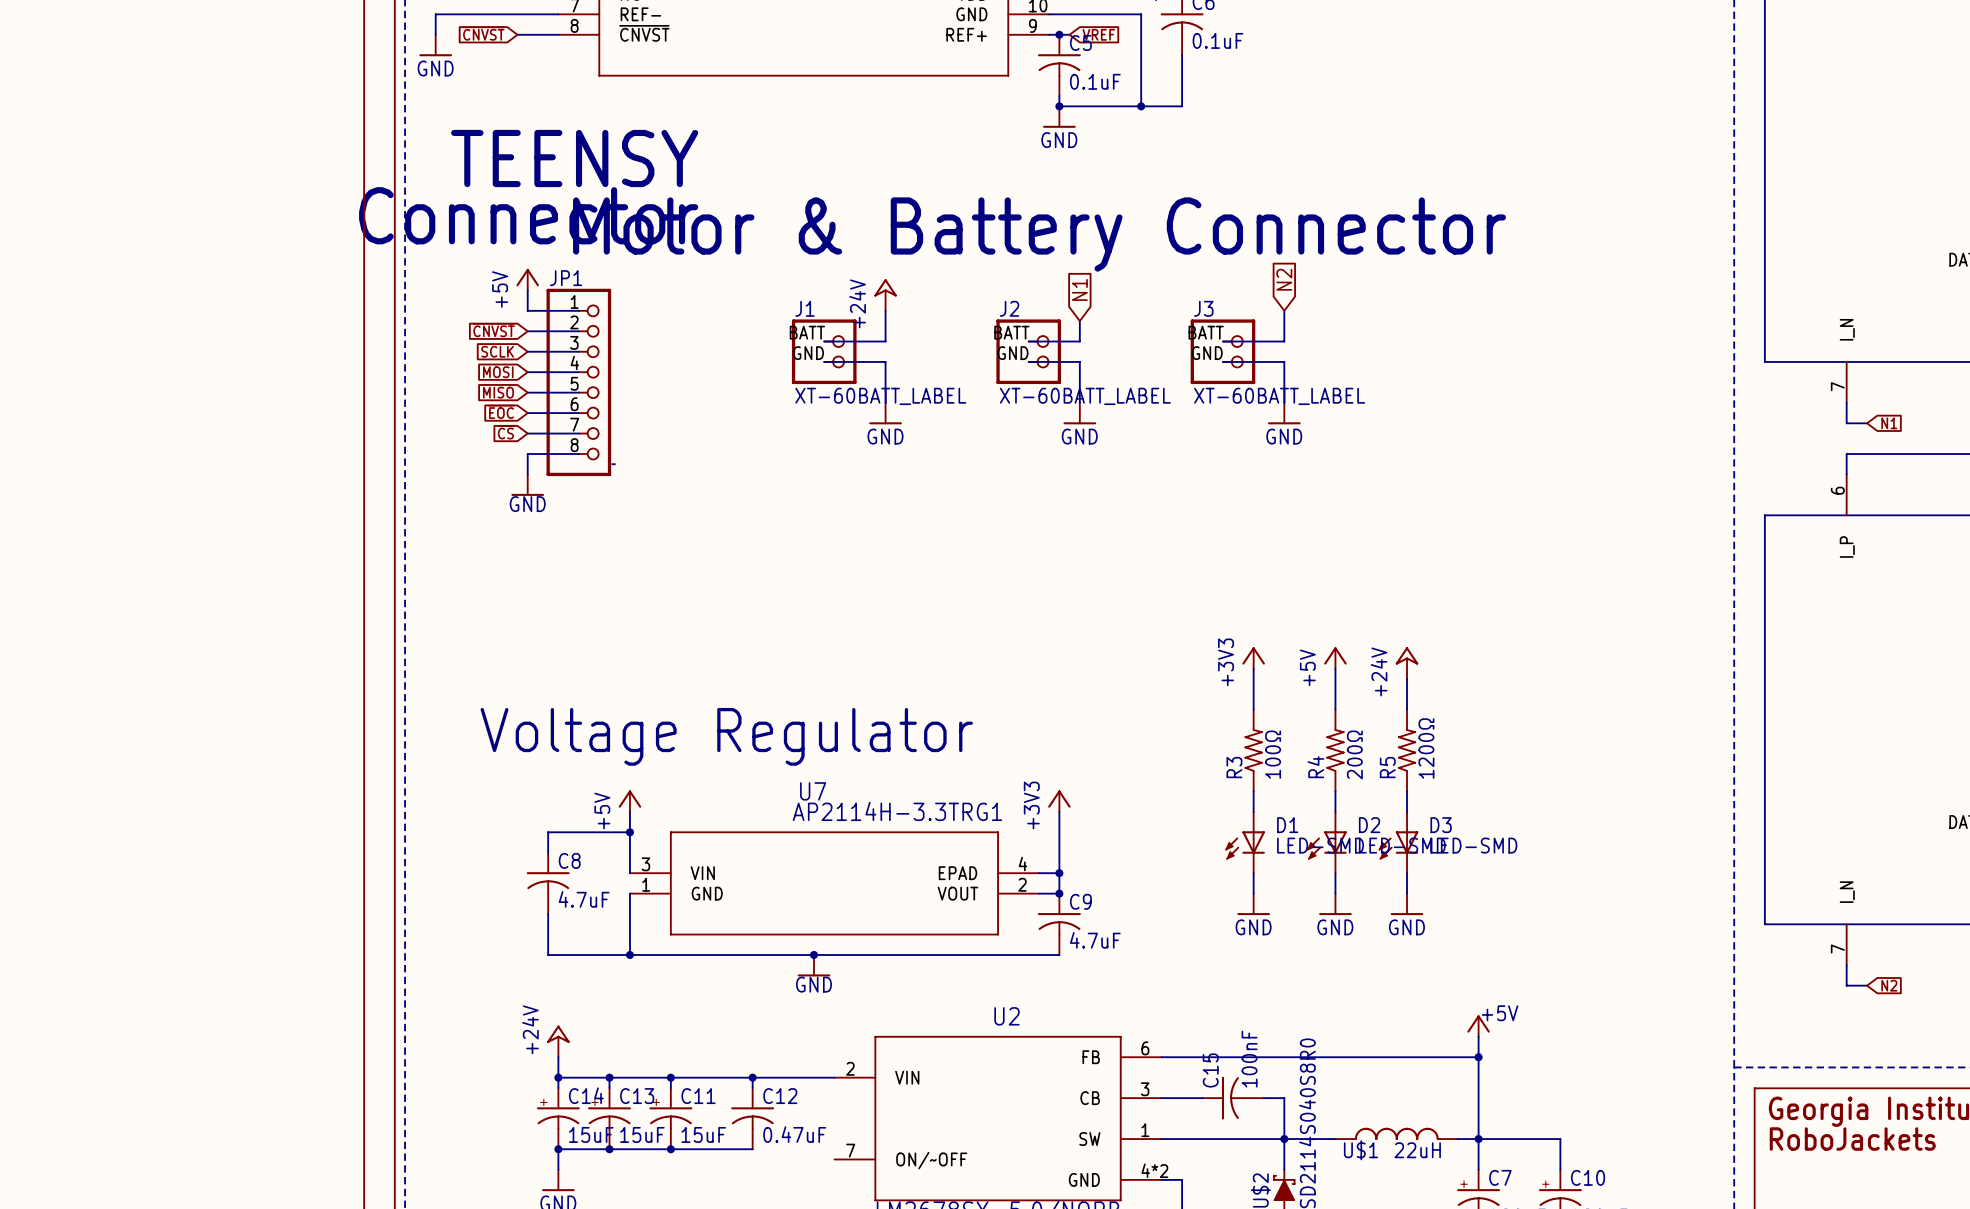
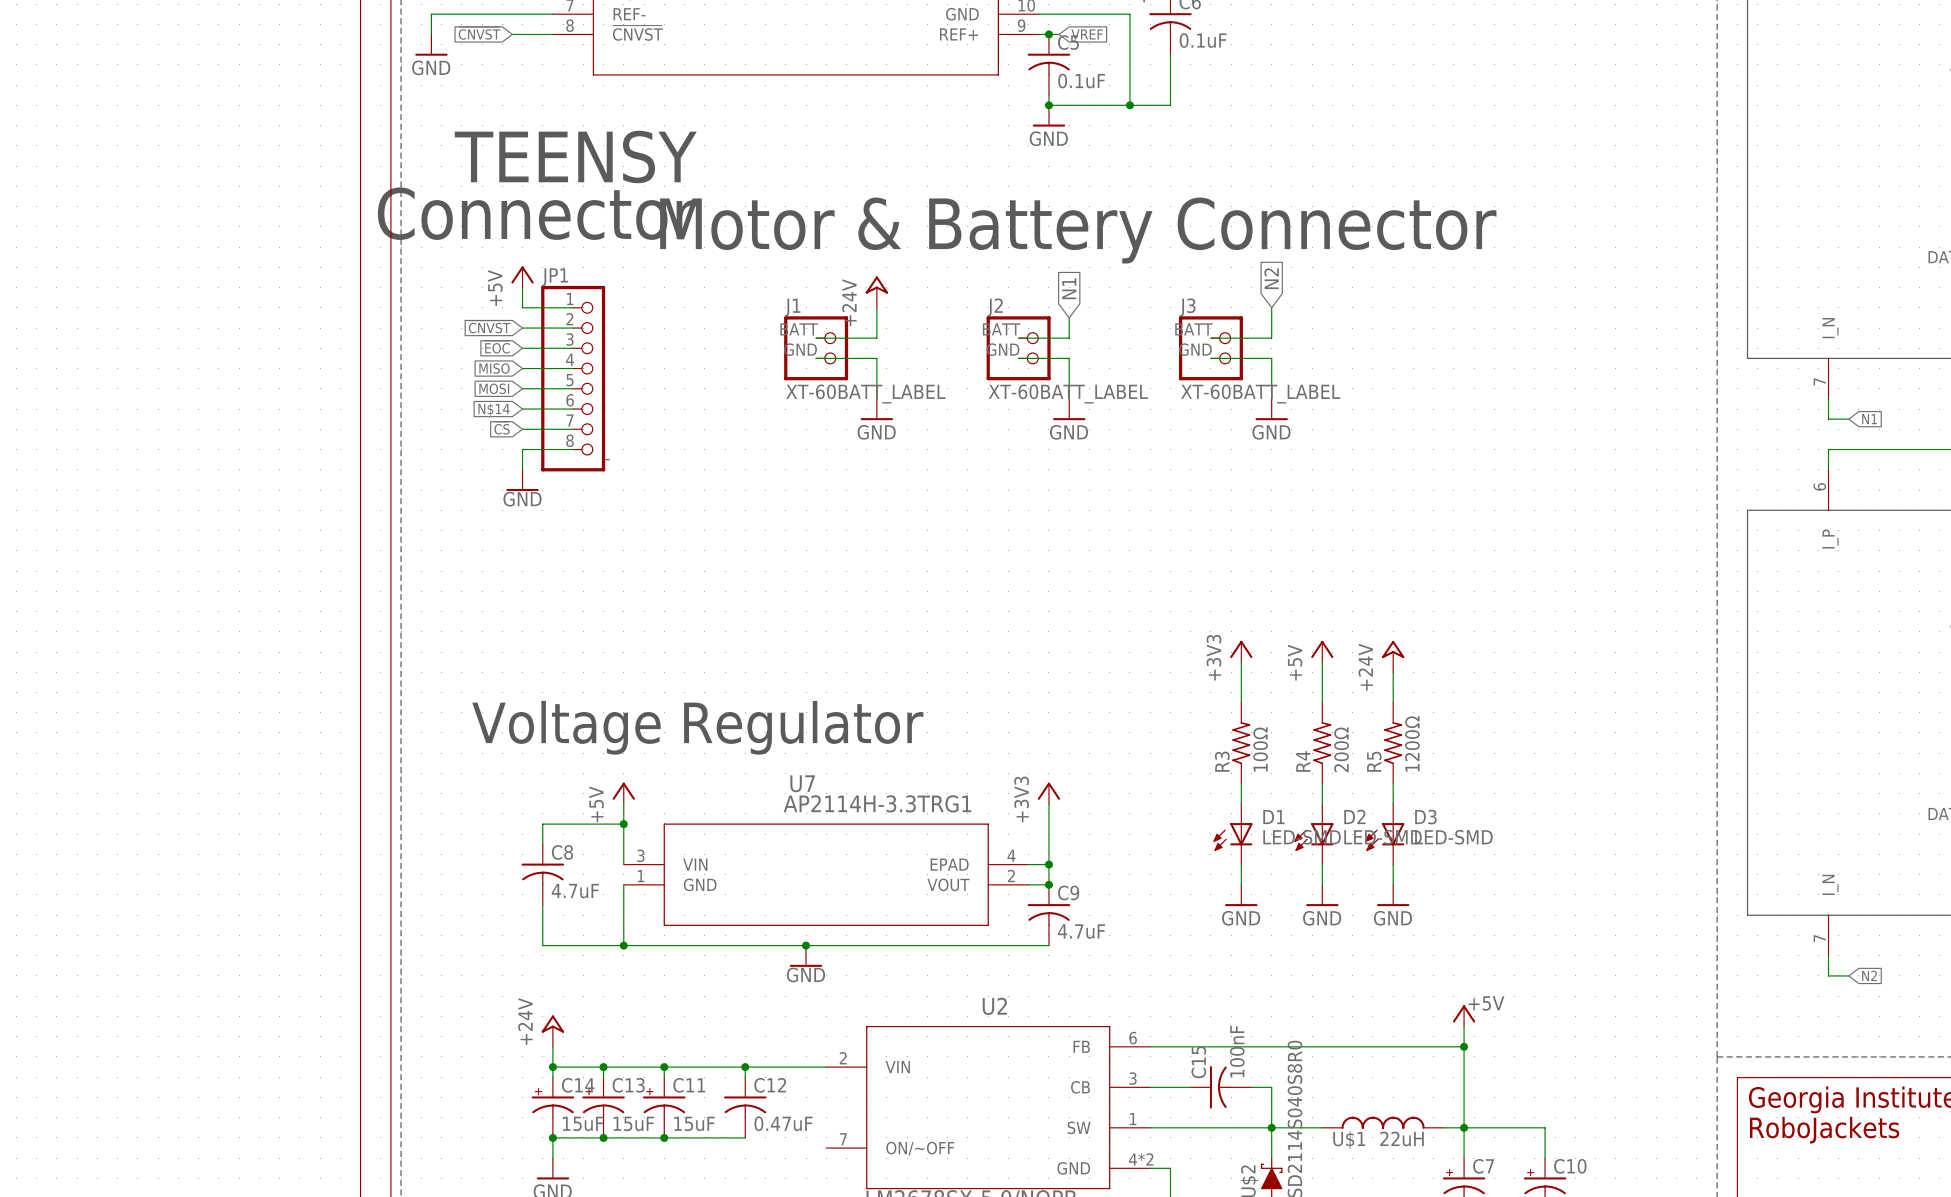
global label: SCLK (497, 351) -> ~{EOC} (497, 347)
global label: MOSI (498, 372) -> MISO (494, 368)
global label: MISO (498, 392) -> MOSI (494, 388)
global label: ~{EOC} (501, 411) -> N$14 (494, 409)

